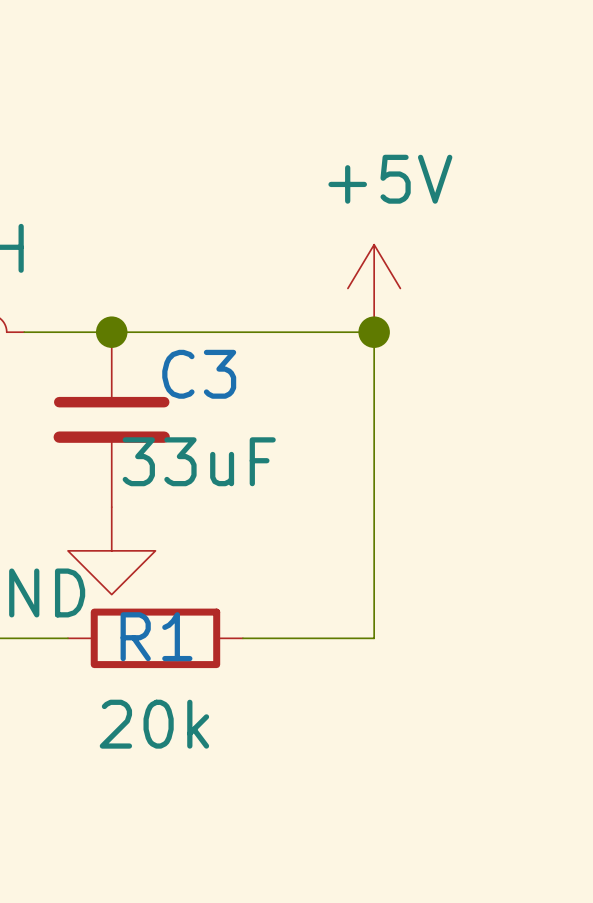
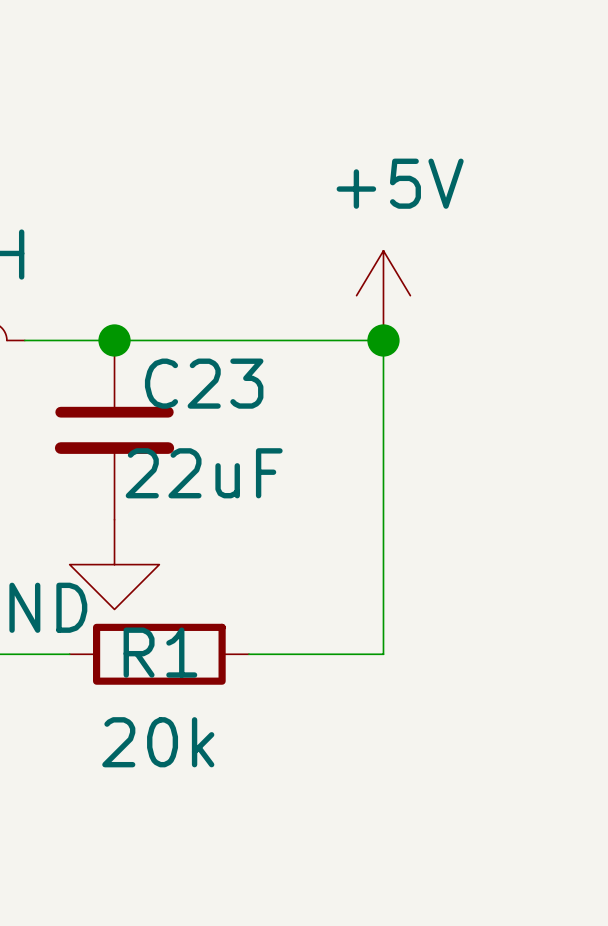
C3 name: C3 (199, 374) -> C23 (204, 383)
C3 value: 33uF (199, 461) -> 22uF (204, 473)

